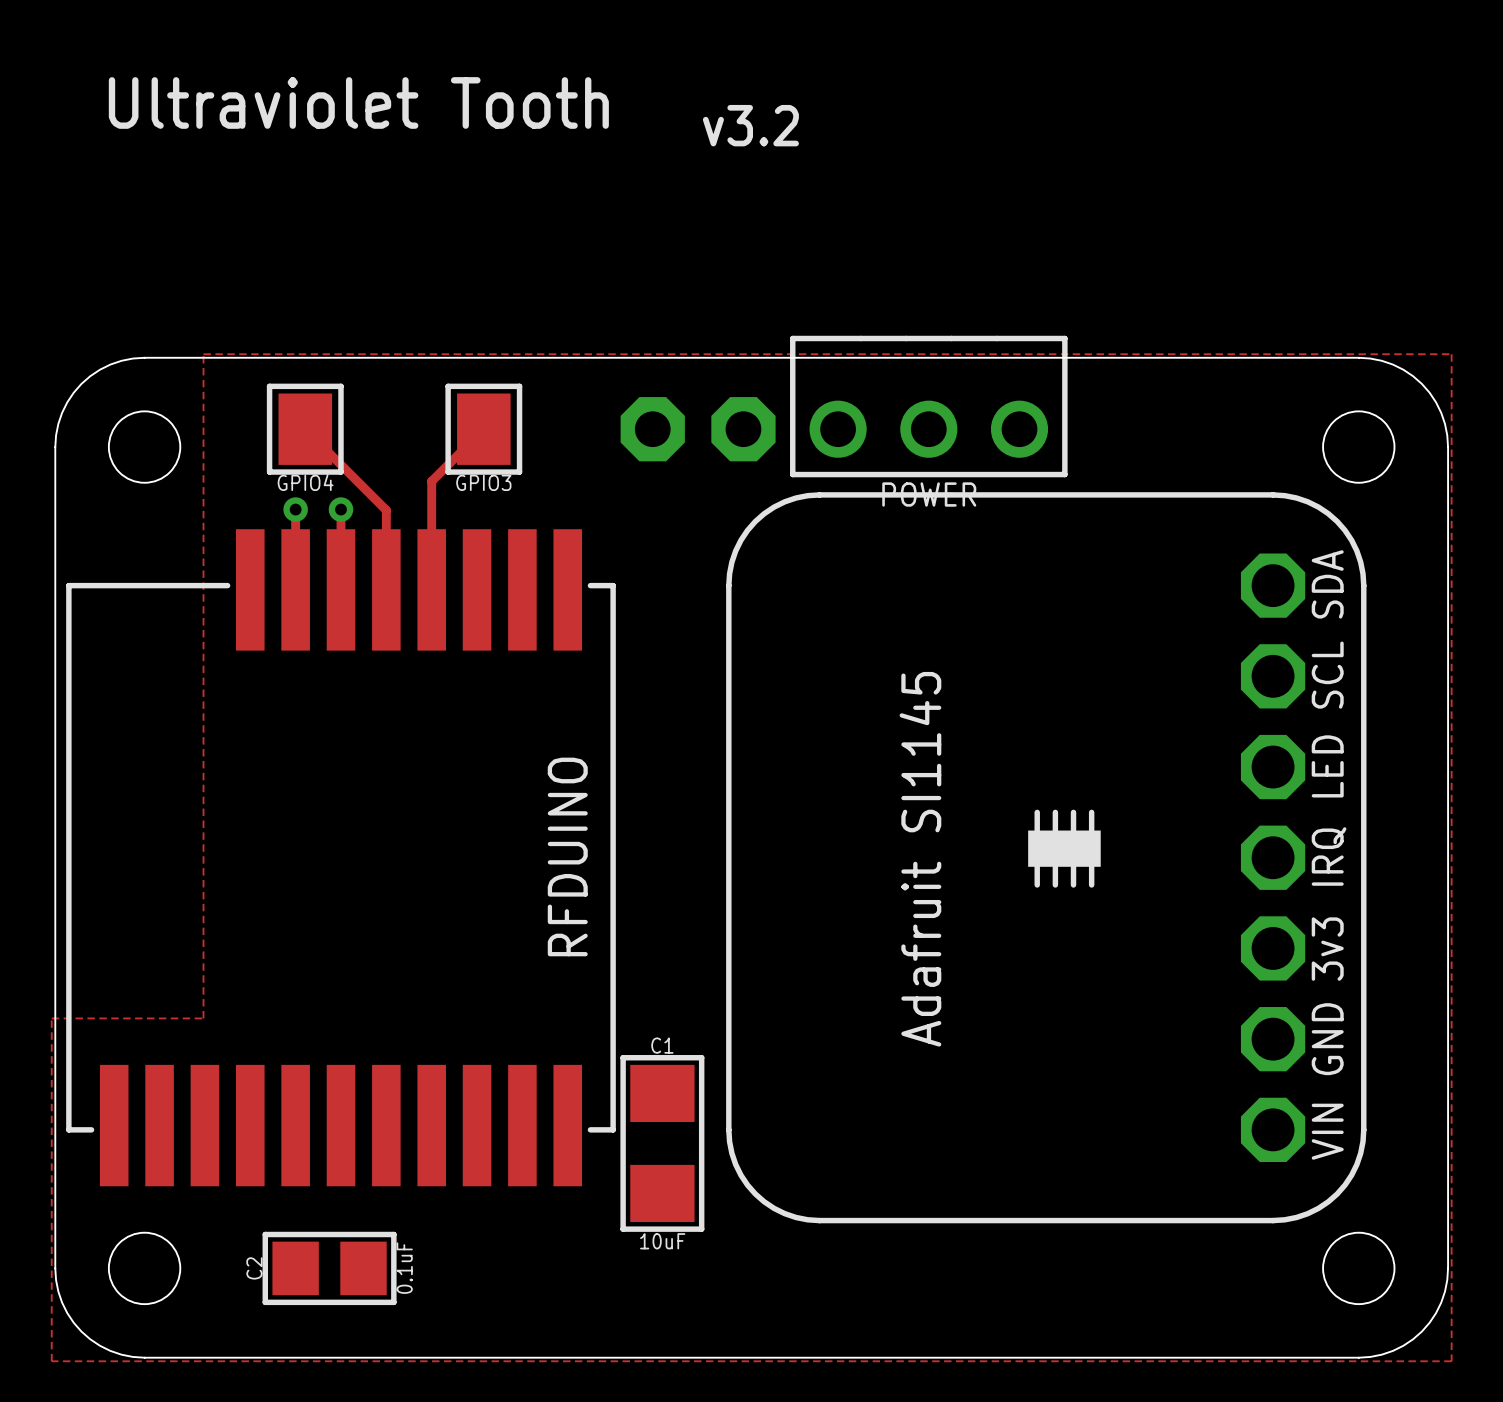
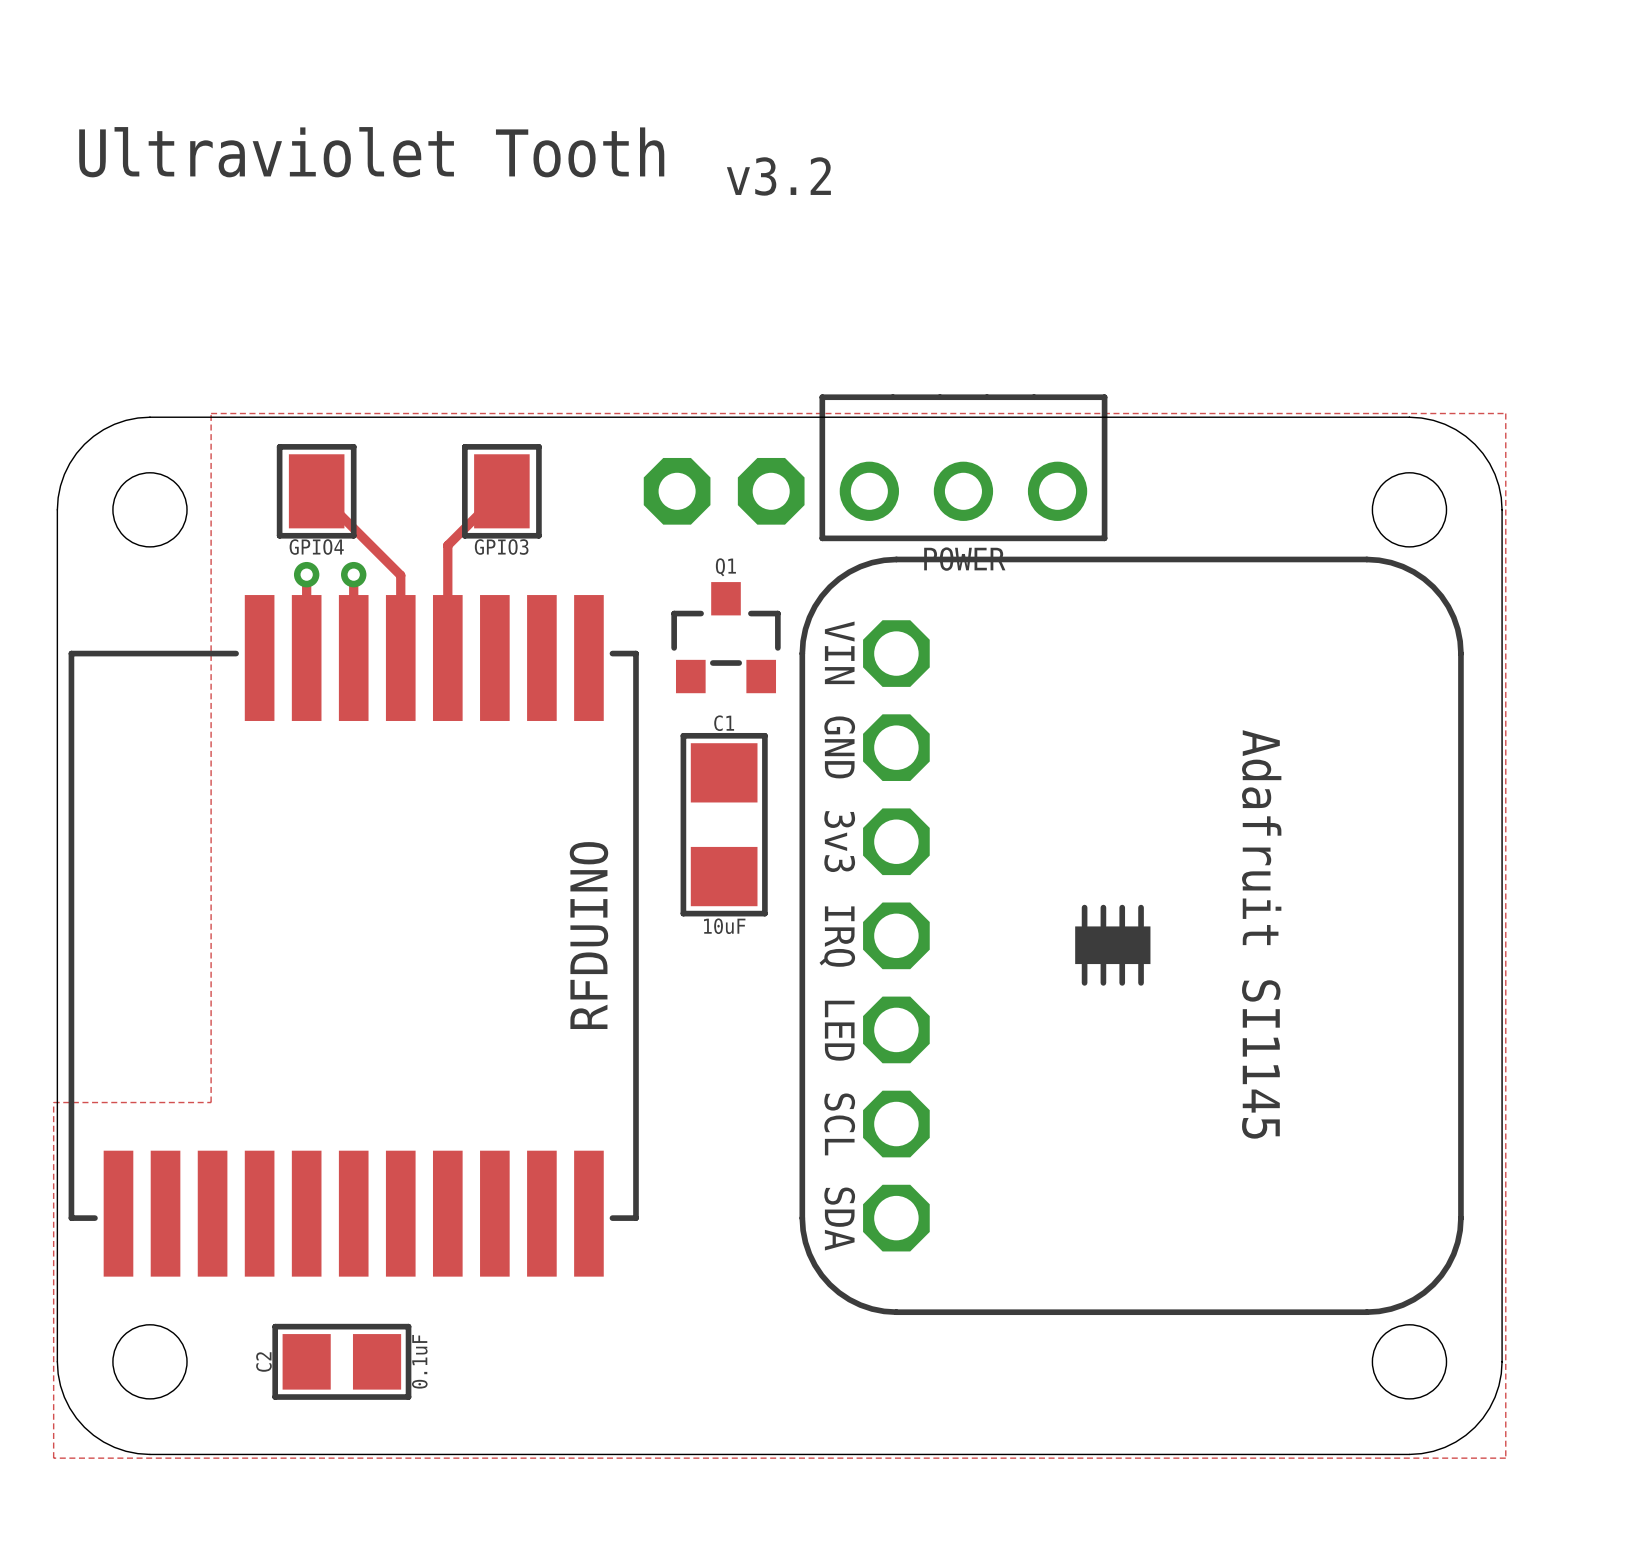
Q1: none -> (726, 637)
part rotation: 0° (1046, 857) -> 180° (1131, 935)
C1 position: (662, 1143) -> (724, 824)

